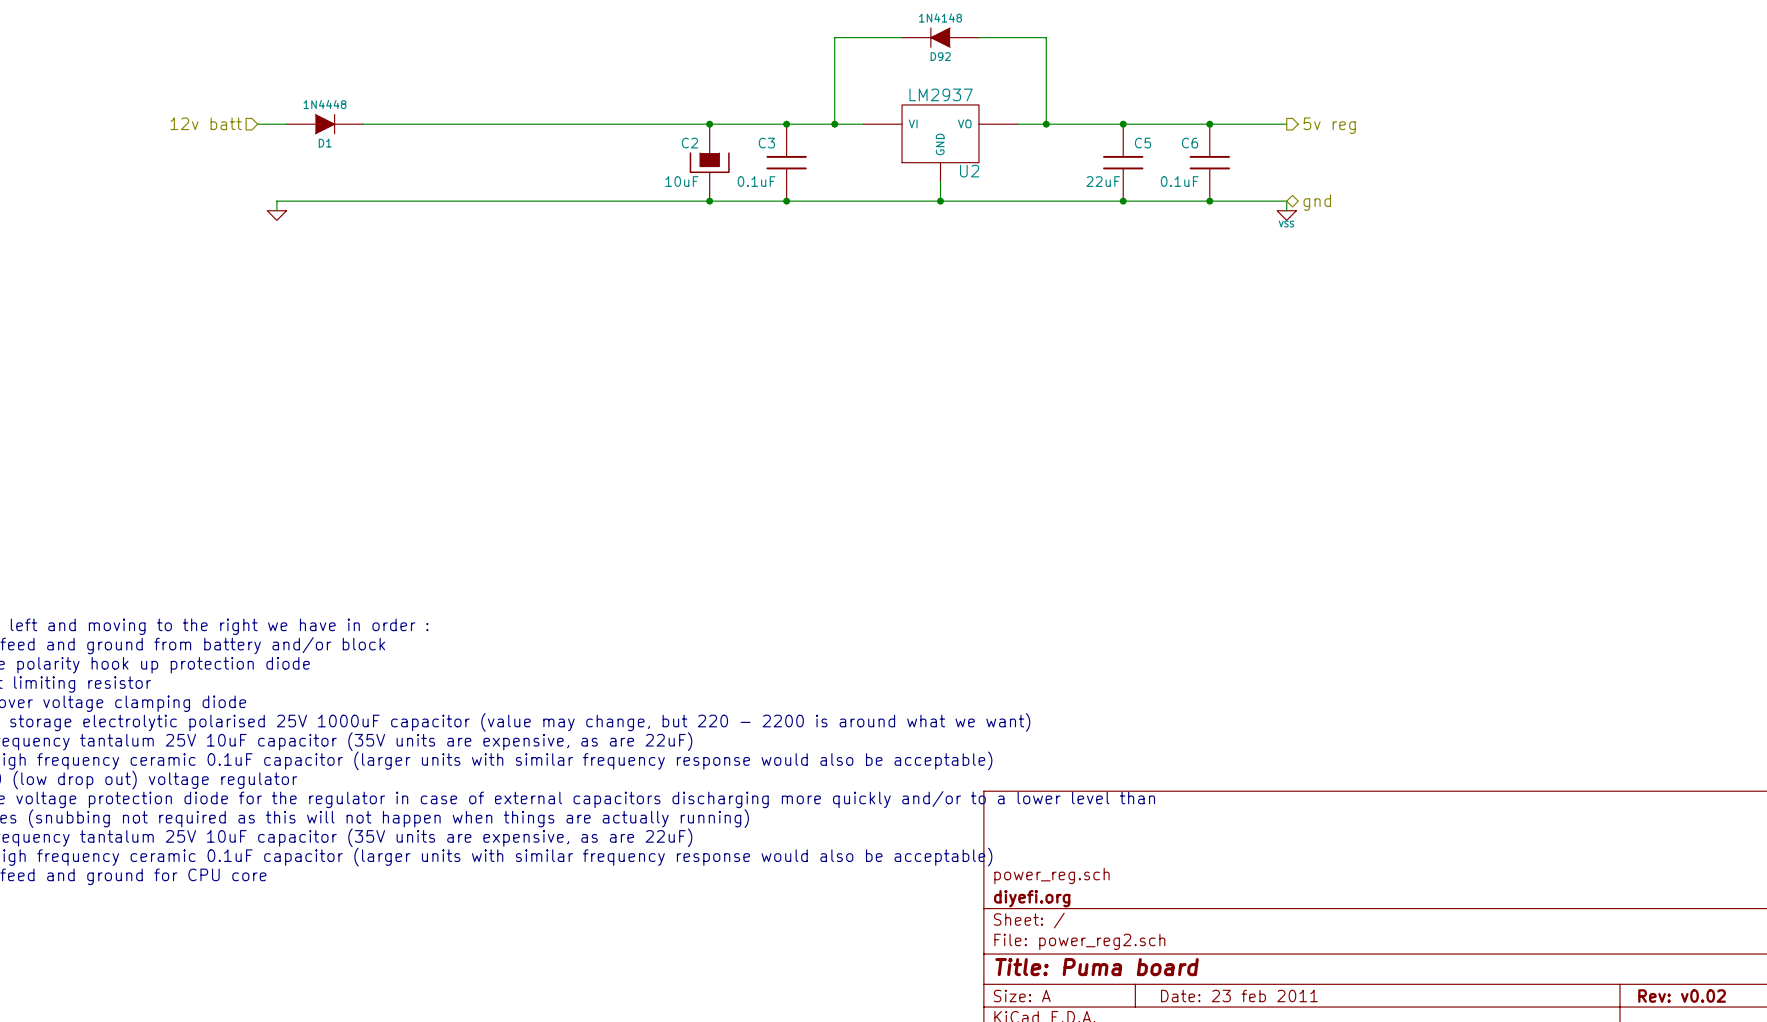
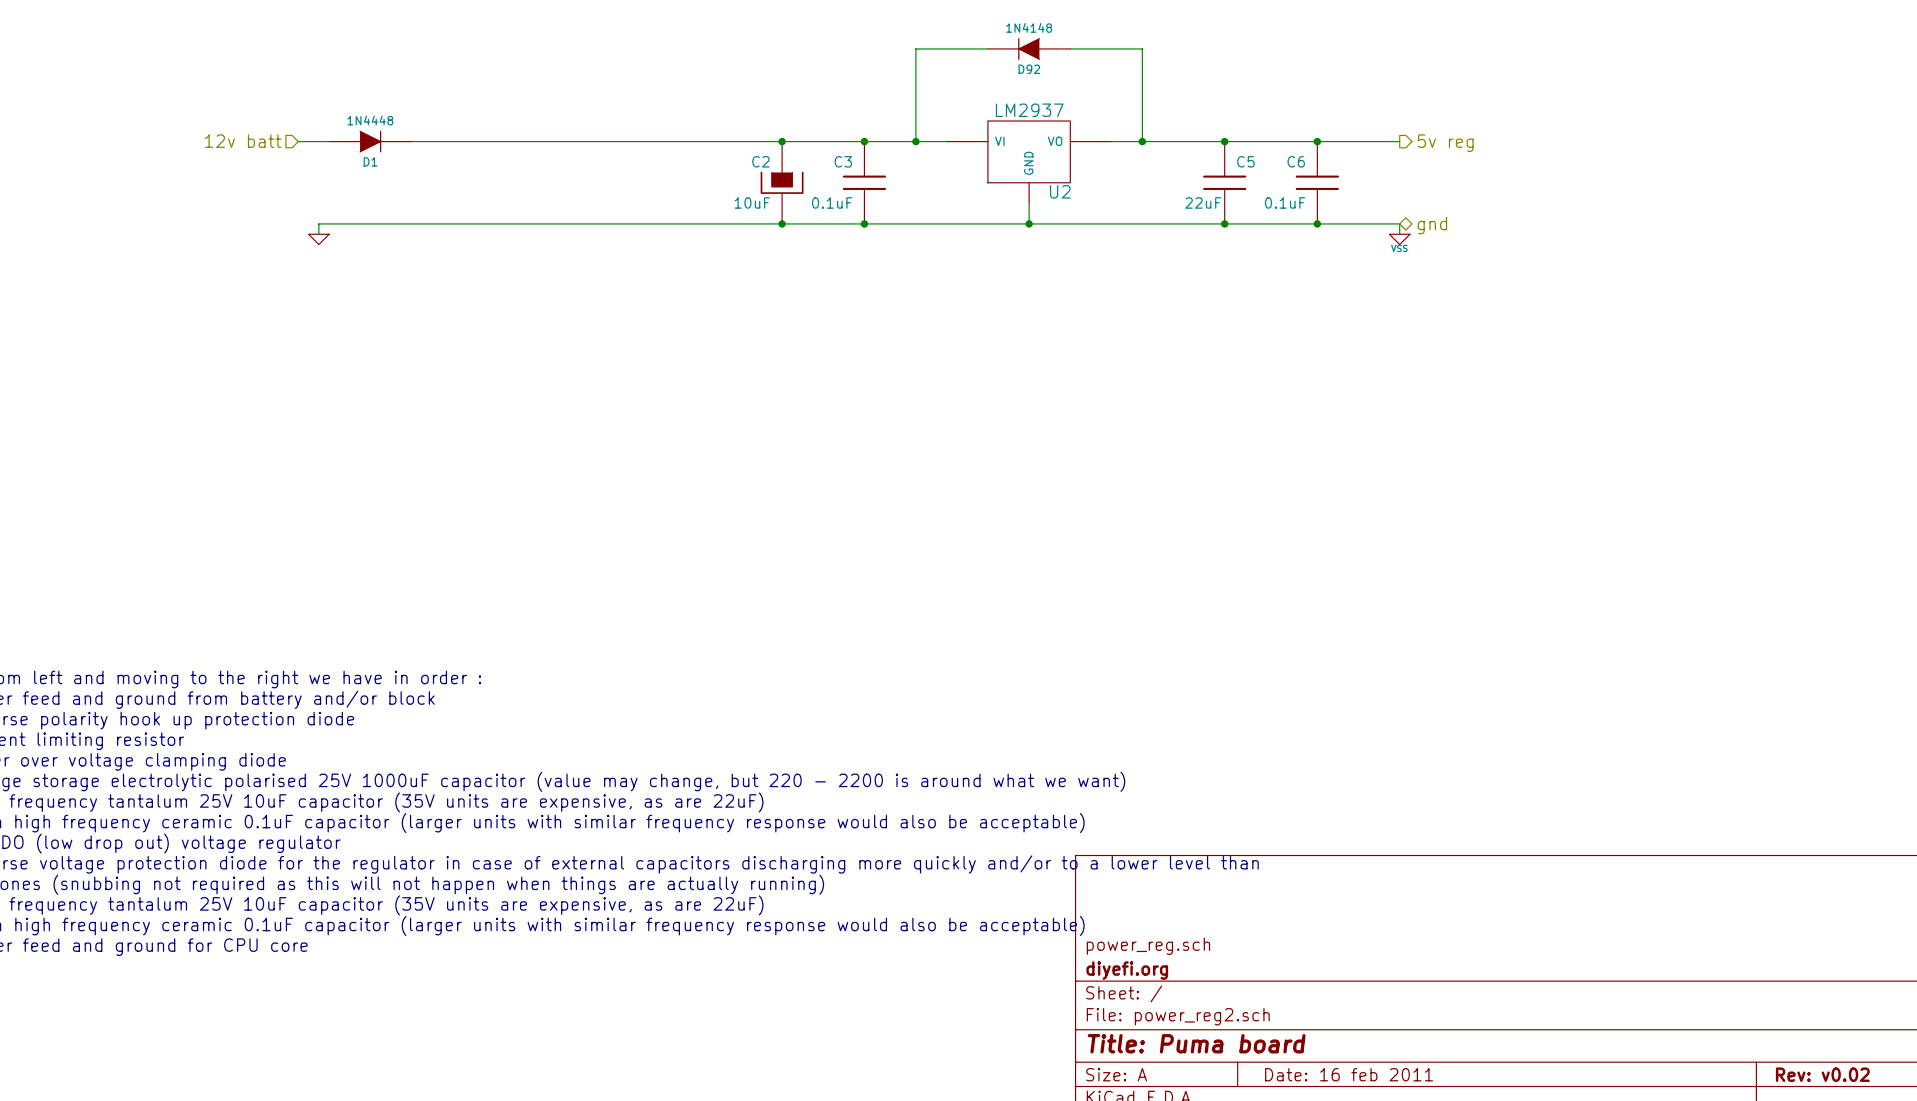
title block: Date: 23 feb 2011 (1239, 996) -> Date: 16 feb 2011 (1349, 1074)

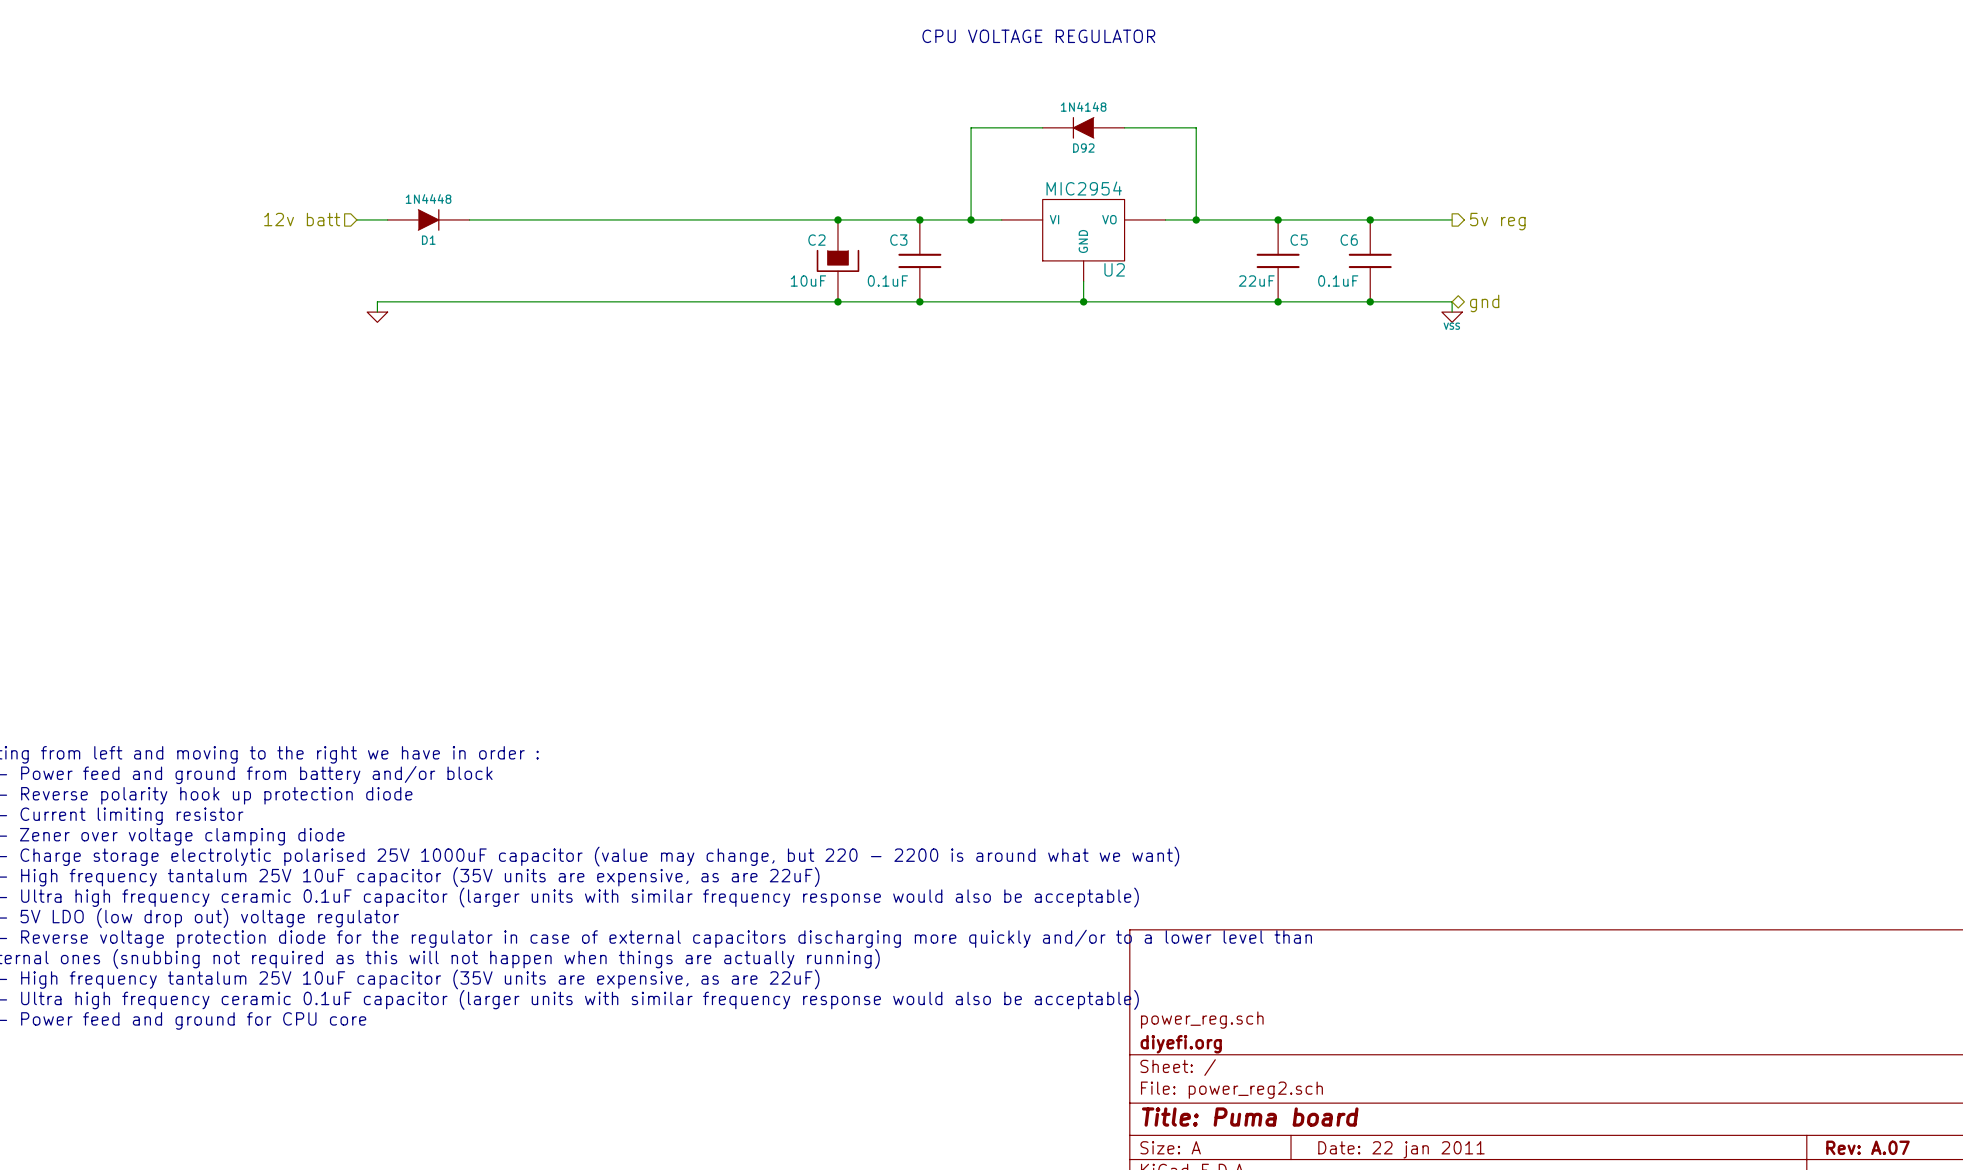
U2 value: LM2937 (1029, 110) -> MIC2954 (1084, 188)
title block: Date: 16 feb 2011 (1349, 1074) -> Date: 22 jan 2011 (1401, 1149)
title block: Rev: v0.02 (1822, 1074) -> Rev: A.07 (1867, 1147)

